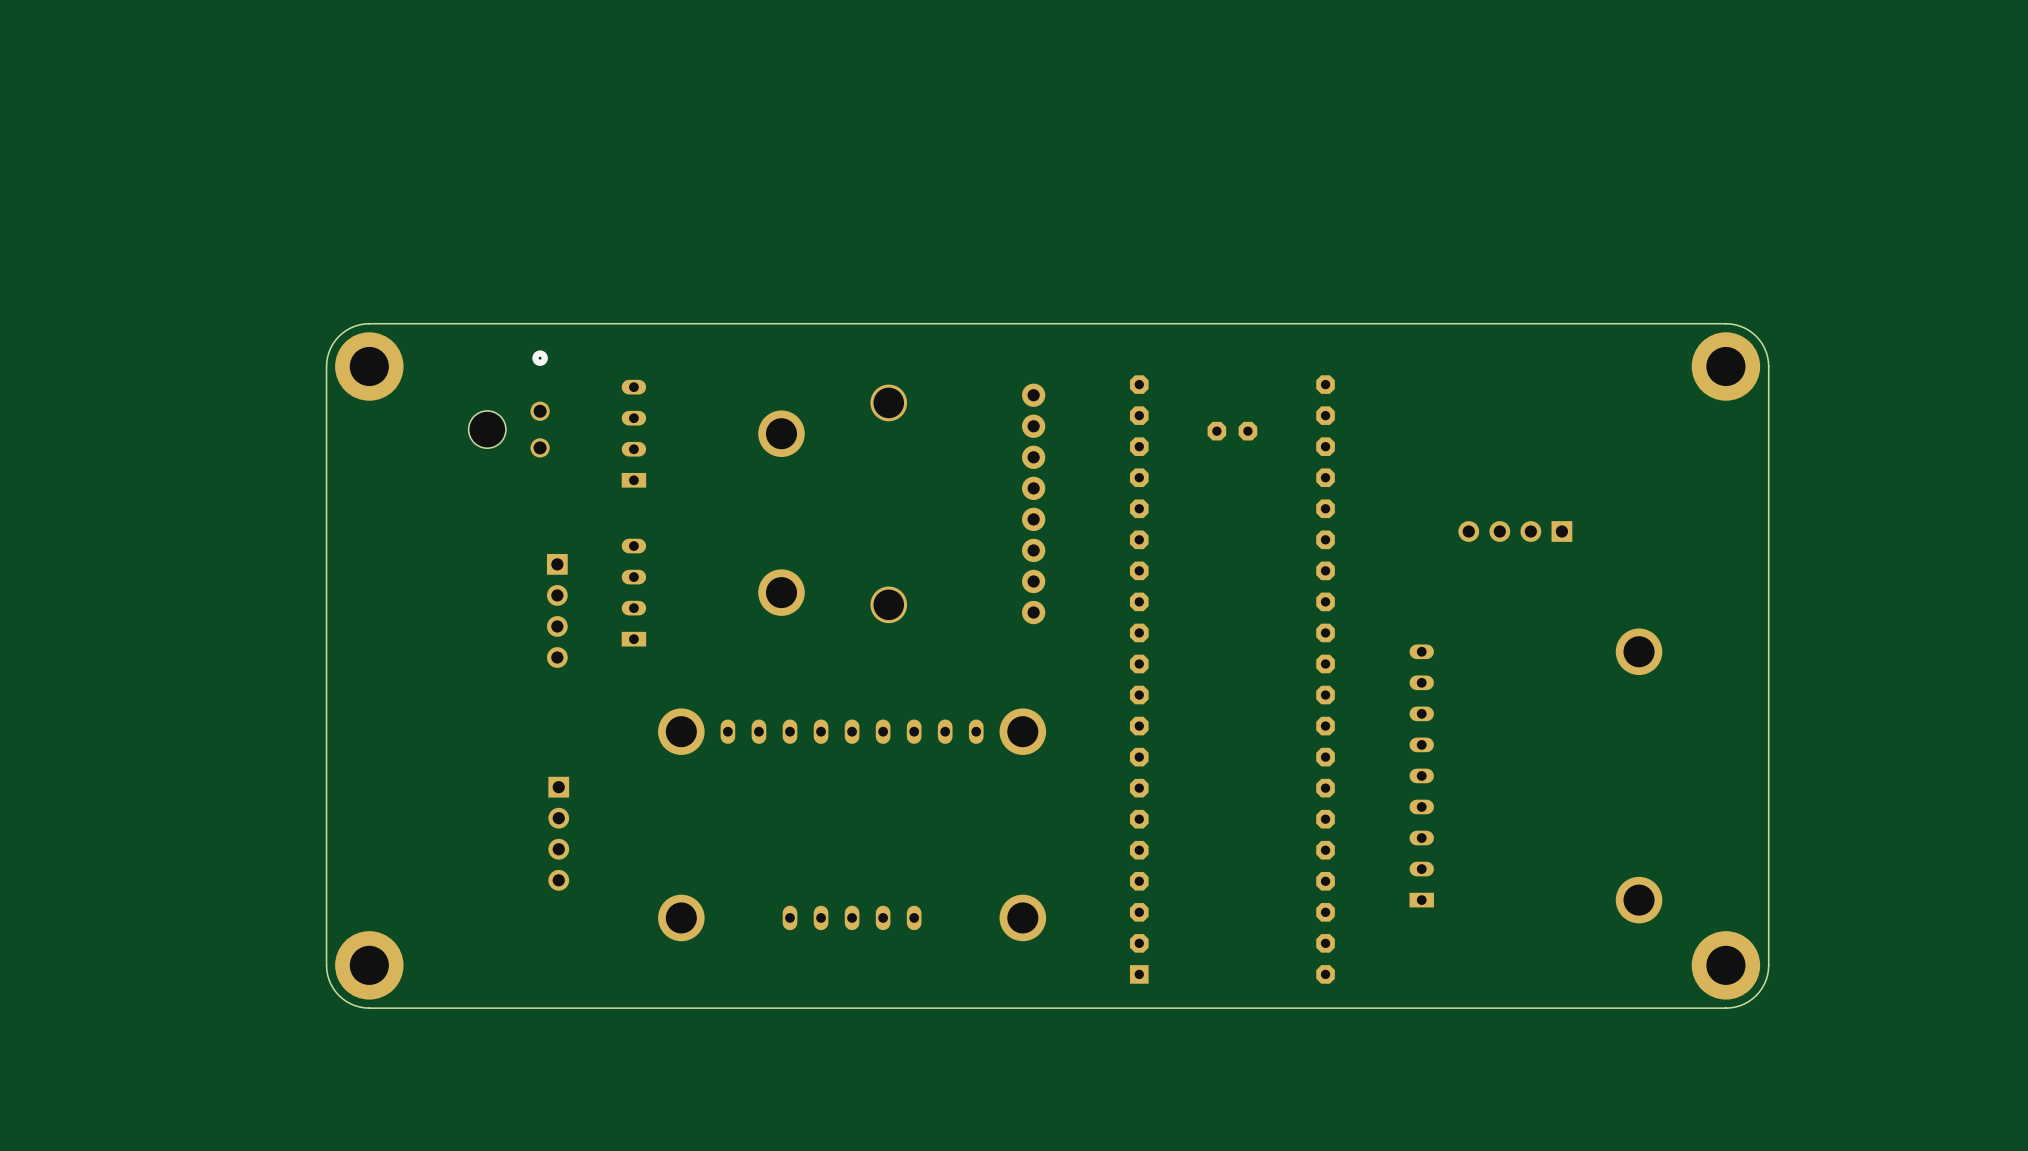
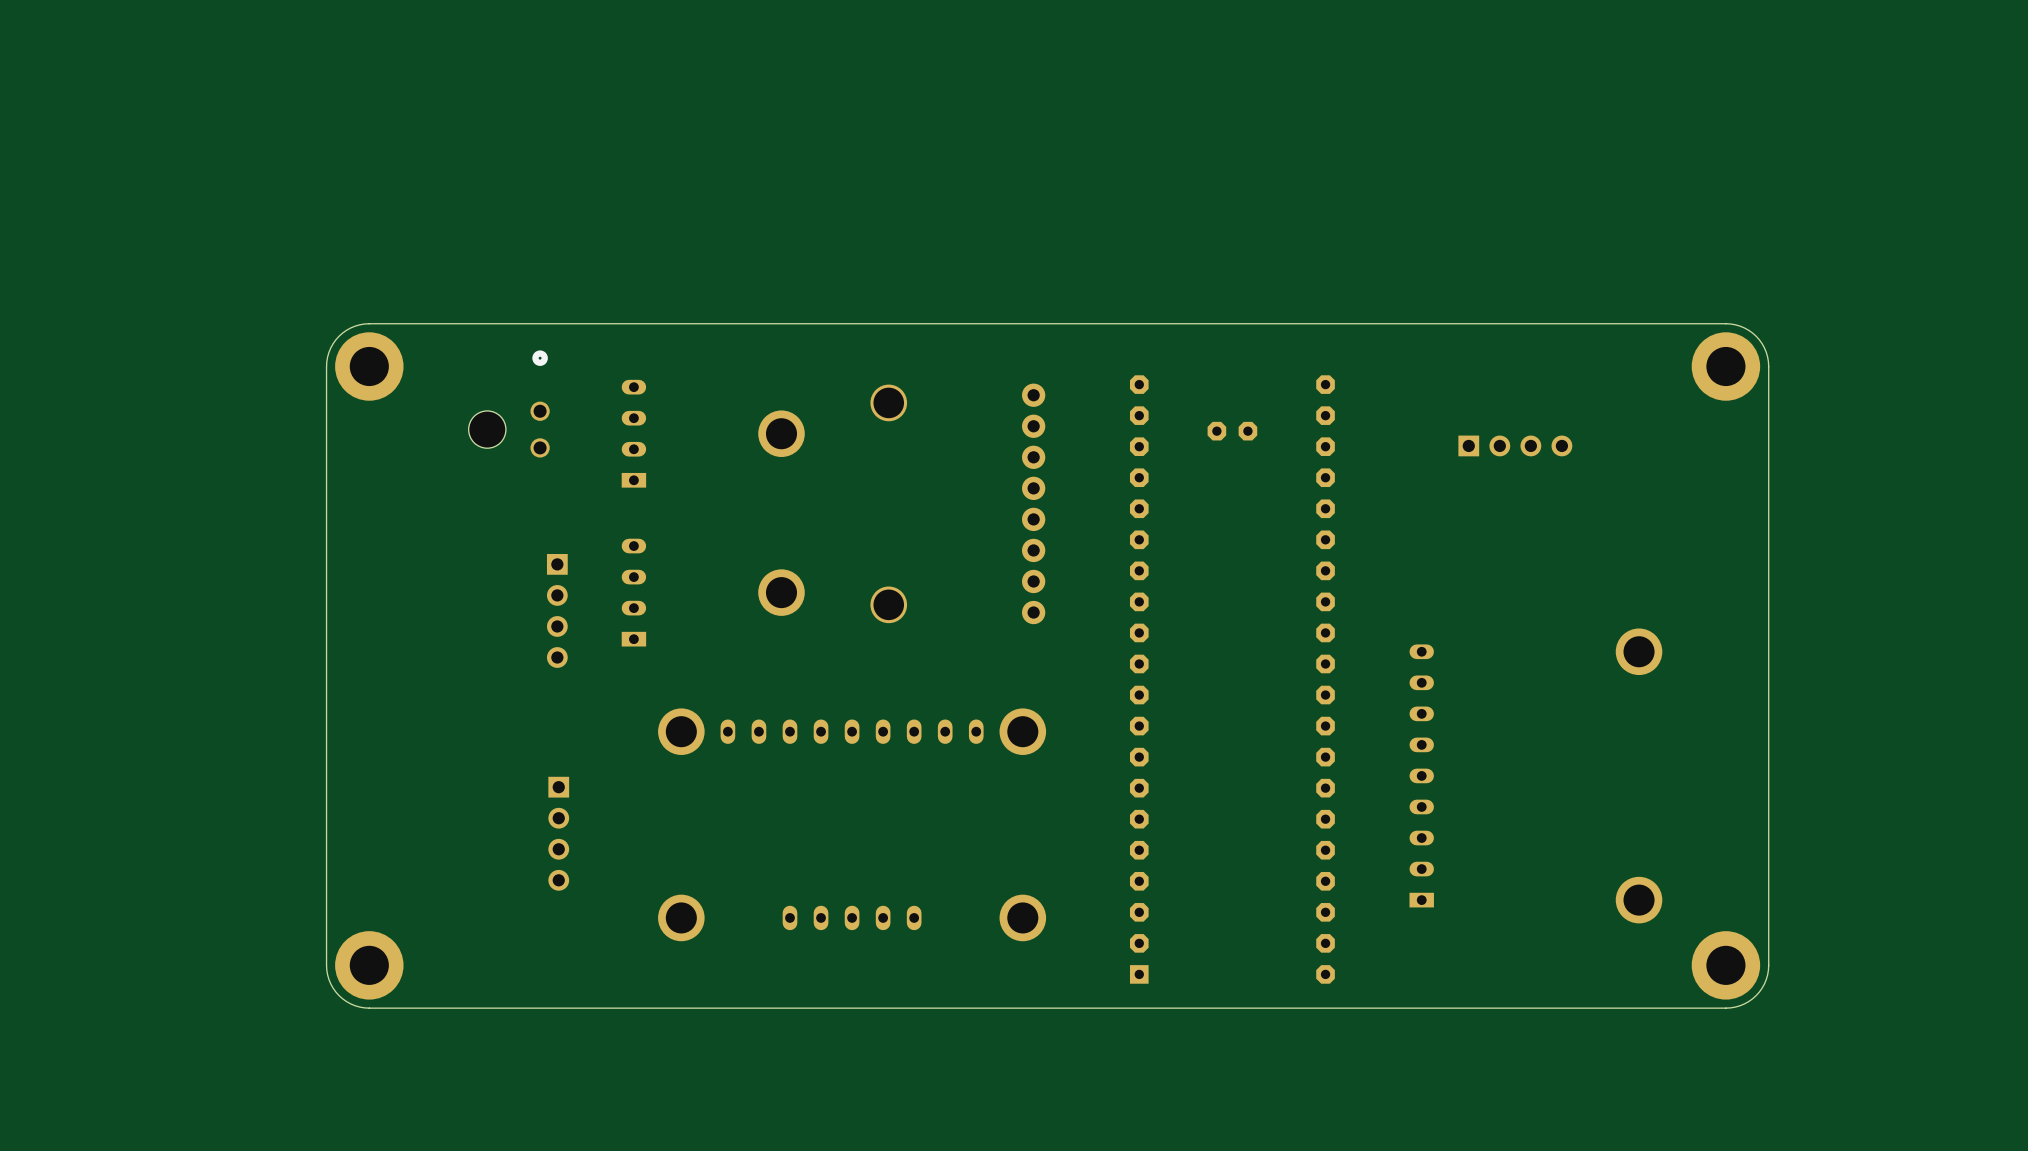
part rotation: 0° (1515, 531) -> 180° (1515, 445)
part position: (1515, 531) -> (1515, 445)

